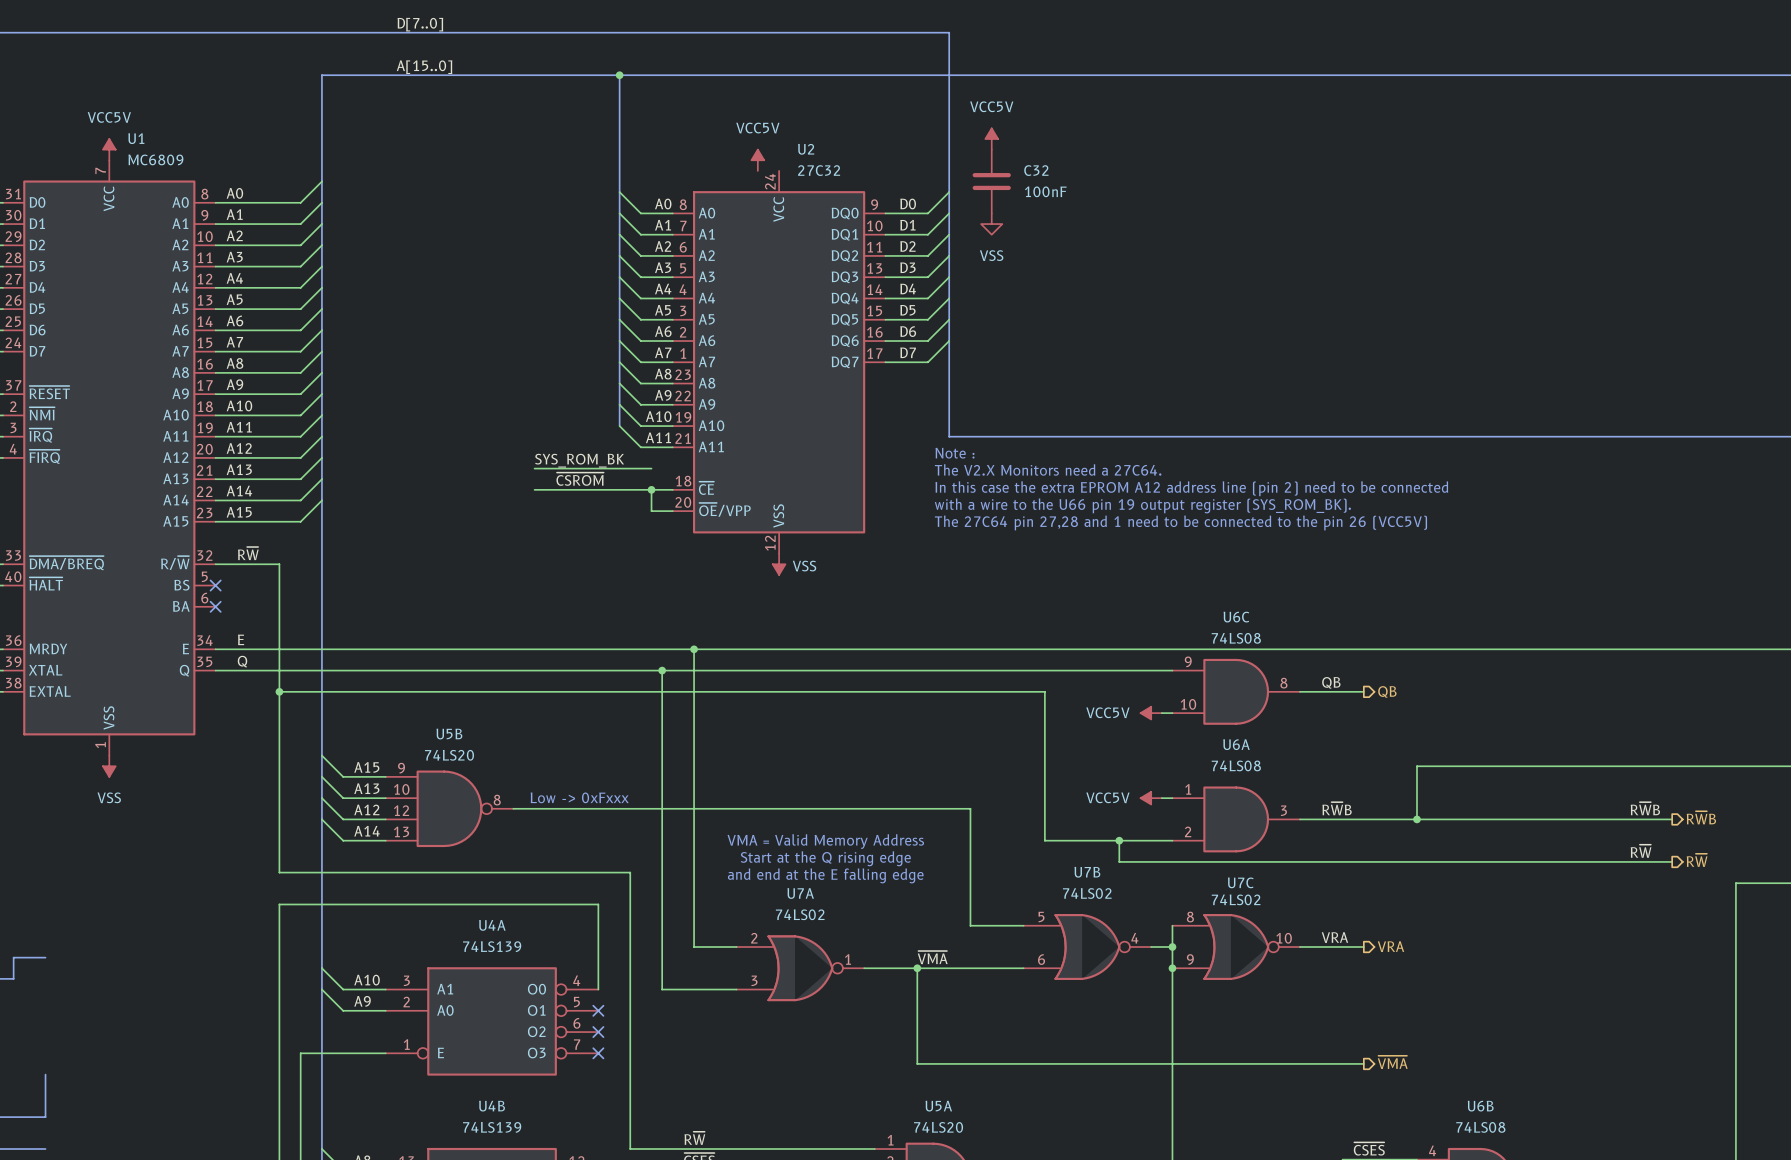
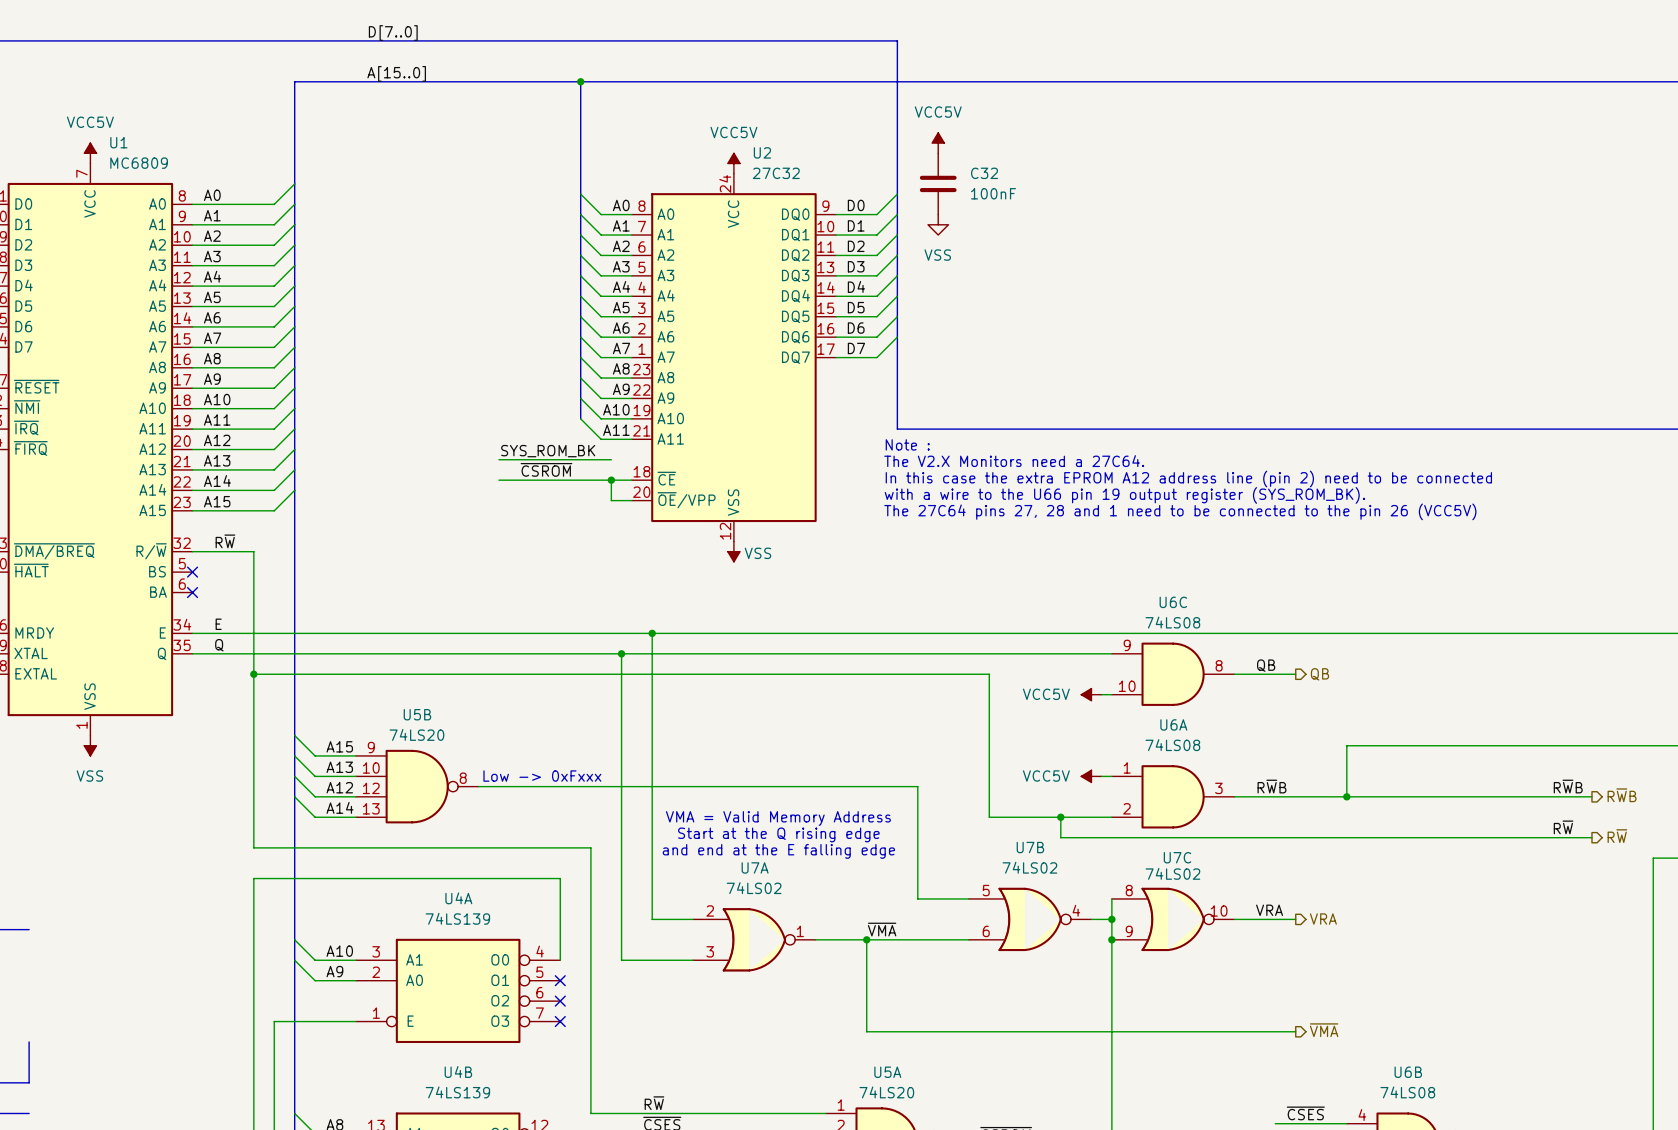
power symbol position: VCC5V (757, 160) -> VCC5V (733, 163)
text: The 27C64 pin 27,28 and 1 need to be connected to the pin 26 (VCC5V) (1180, 522) -> The 27C64 pins 27, 28 and 1 need to be connected to the pin 26 (VCC5V) (1180, 511)

